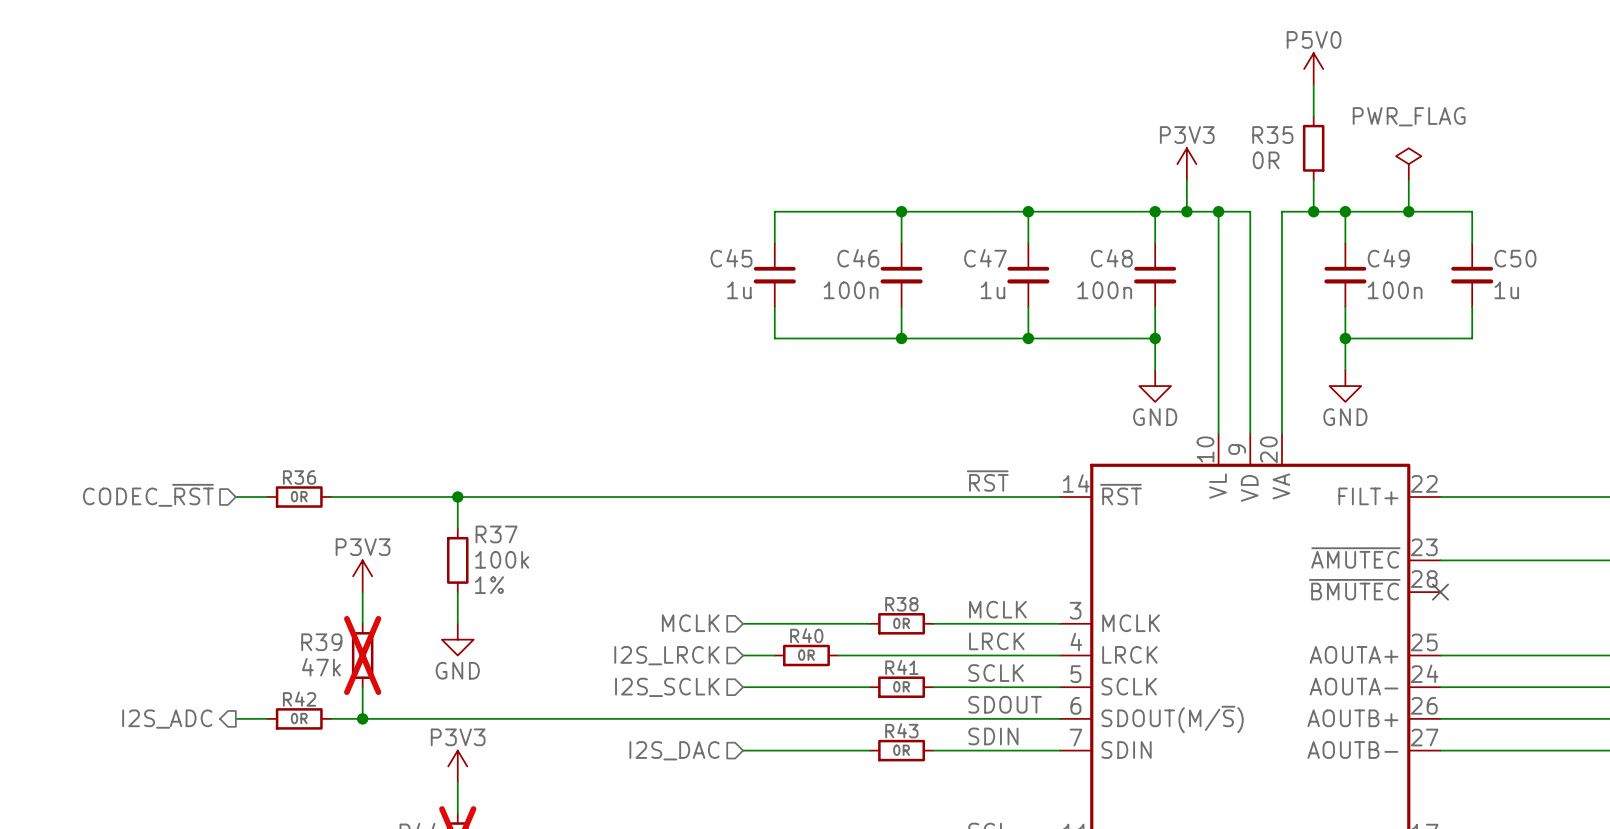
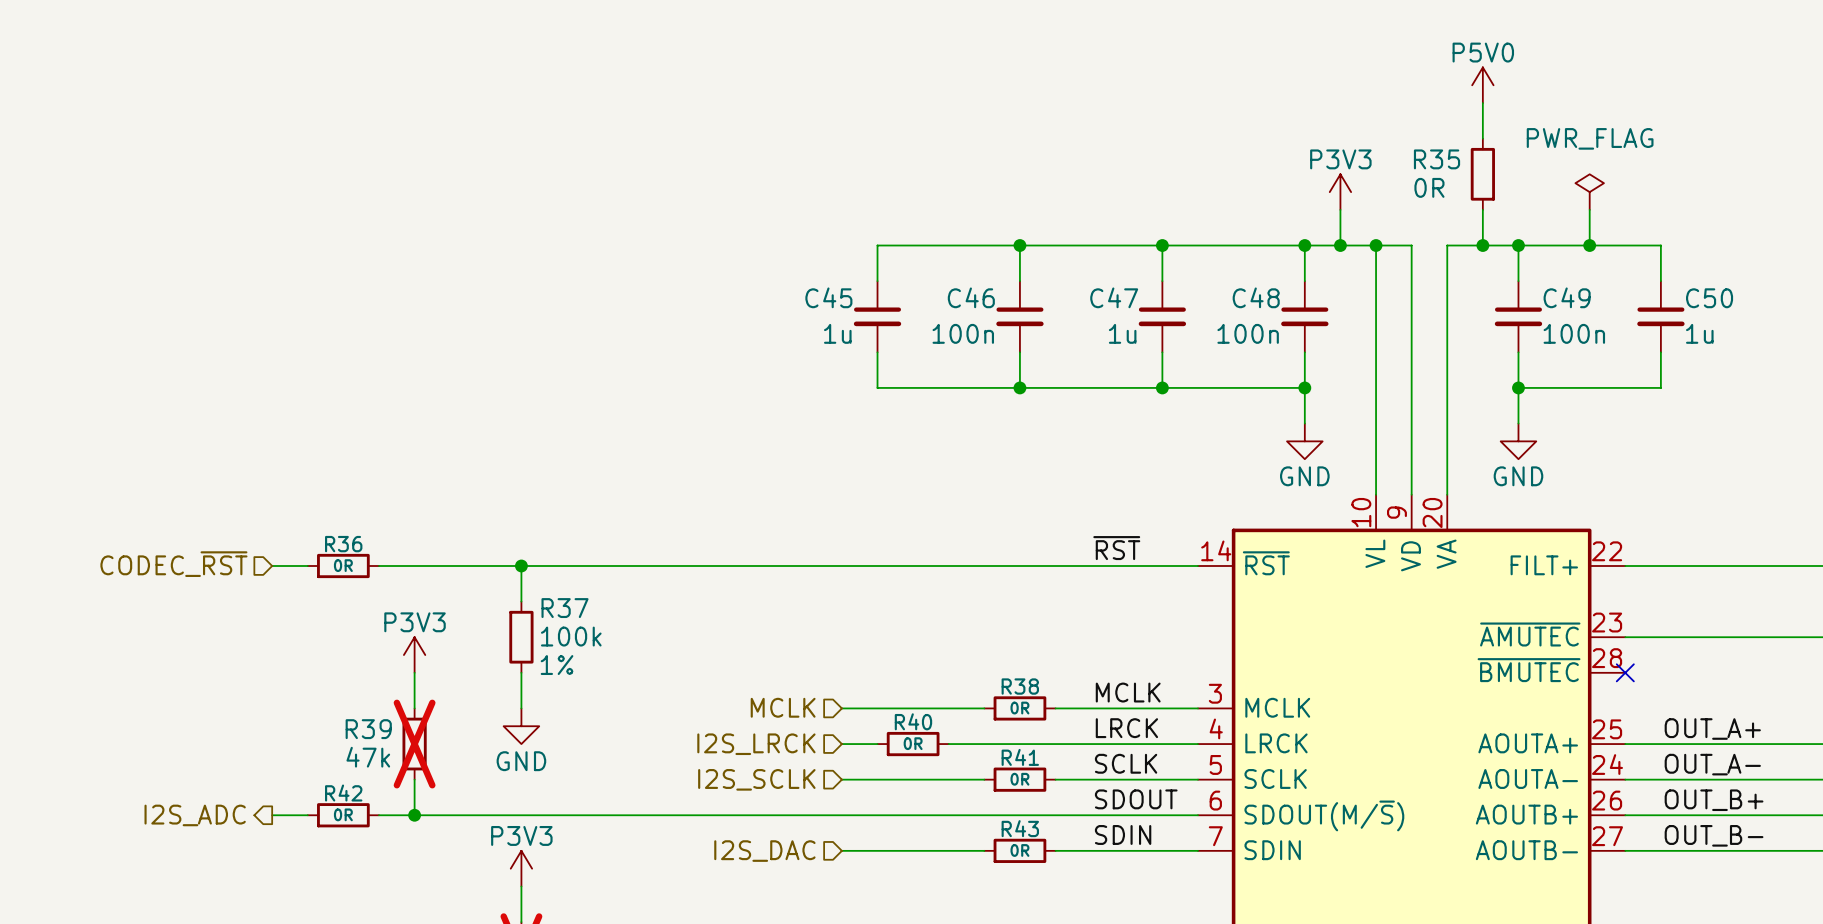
label: none -> OUT_A+ (1712, 729)
label: none -> OUT_A- (1712, 764)
label: none -> OUT_B+ (1714, 800)
label: none -> OUT_B- (1714, 835)

